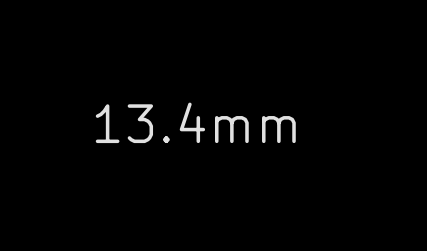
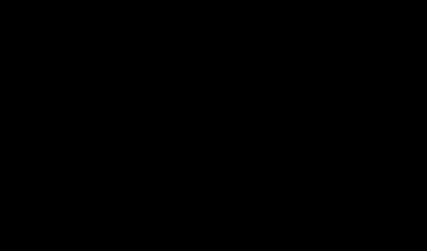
text: 13.4mm (195, 122) -> none

